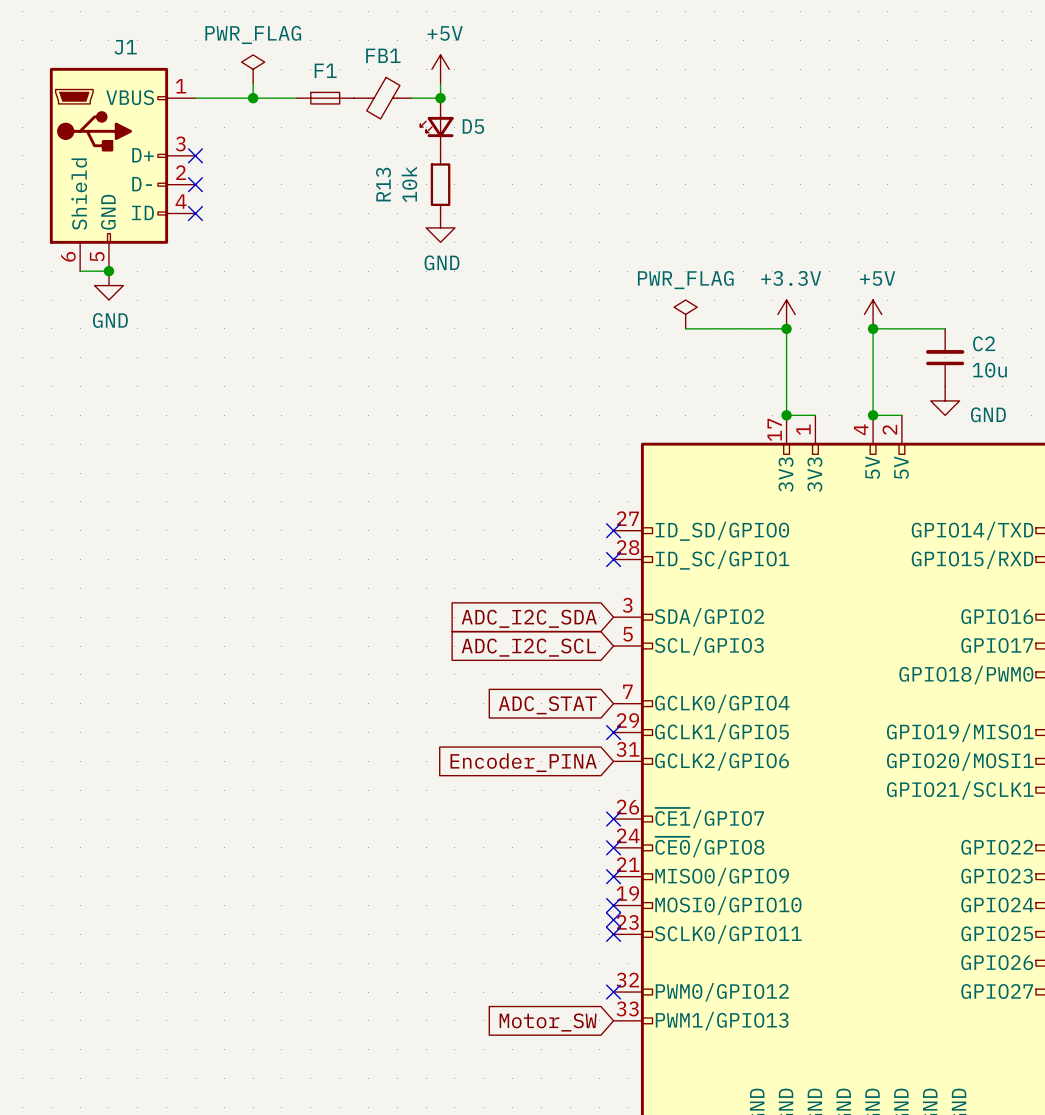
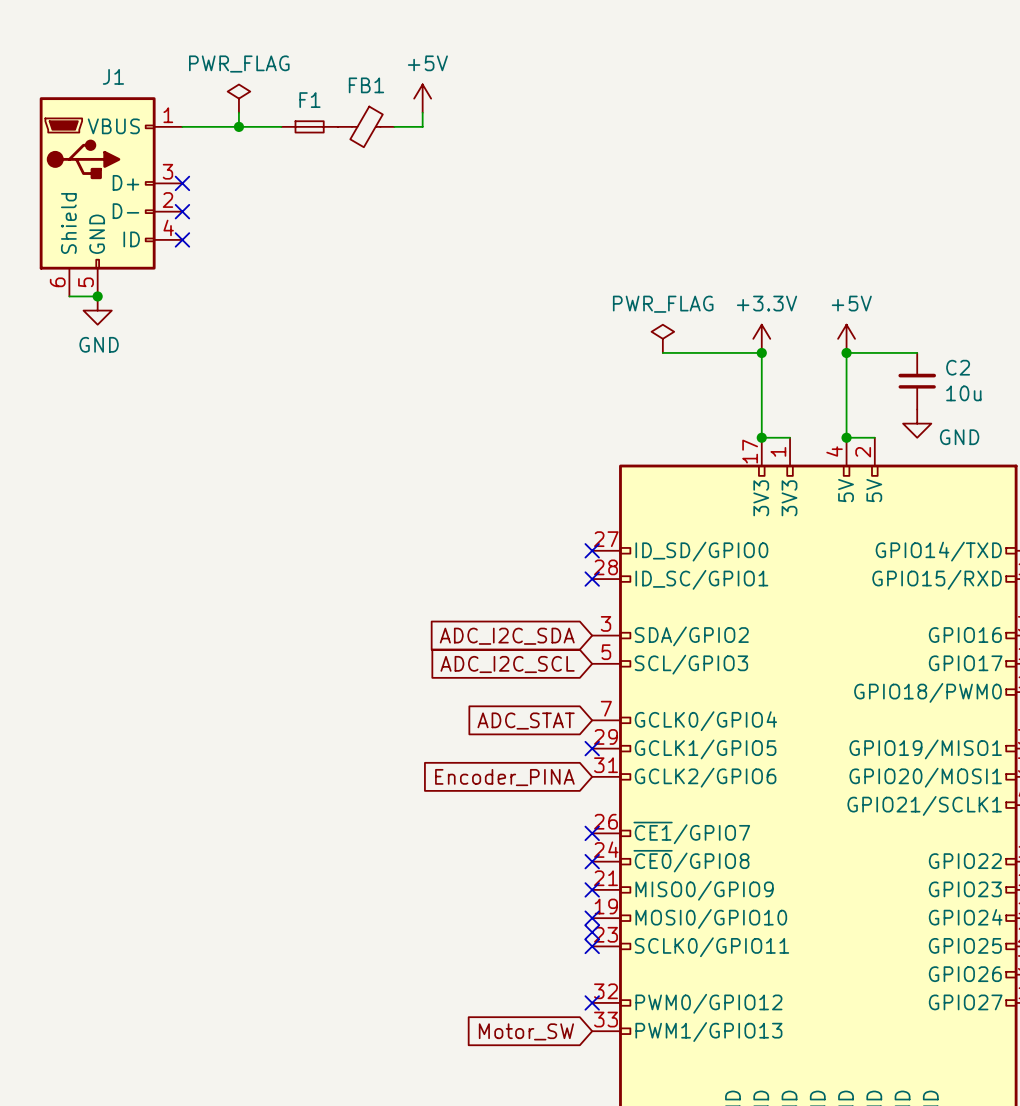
junction: (440, 98) -> none
D5: (436, 127) -> none
R13: 10k (440, 184) -> none
power symbol: GND (440, 227) -> none

